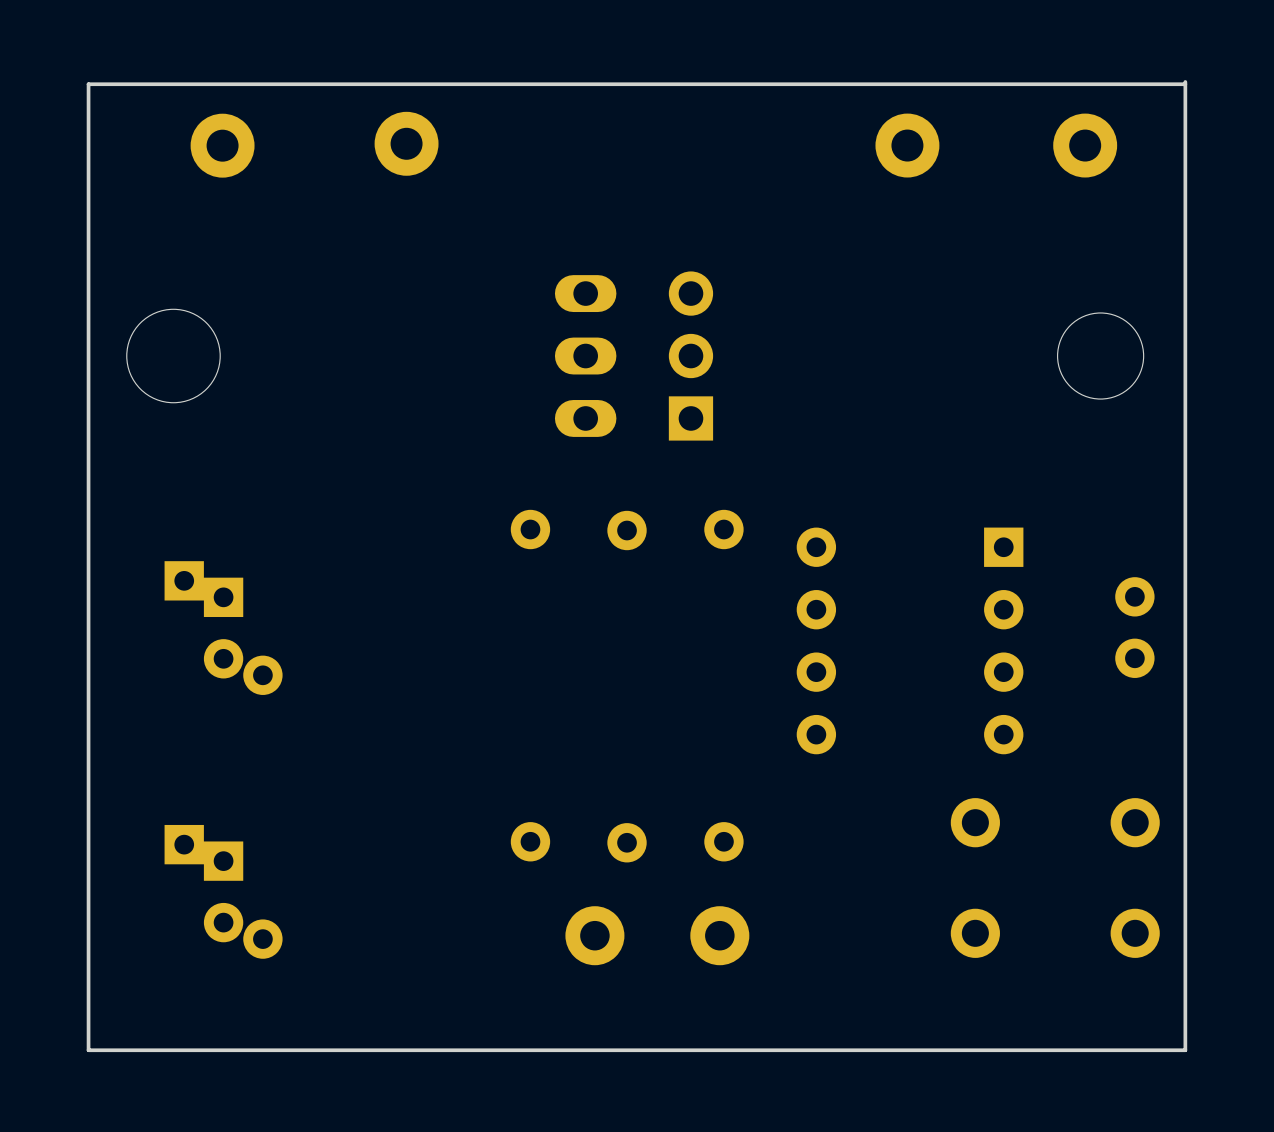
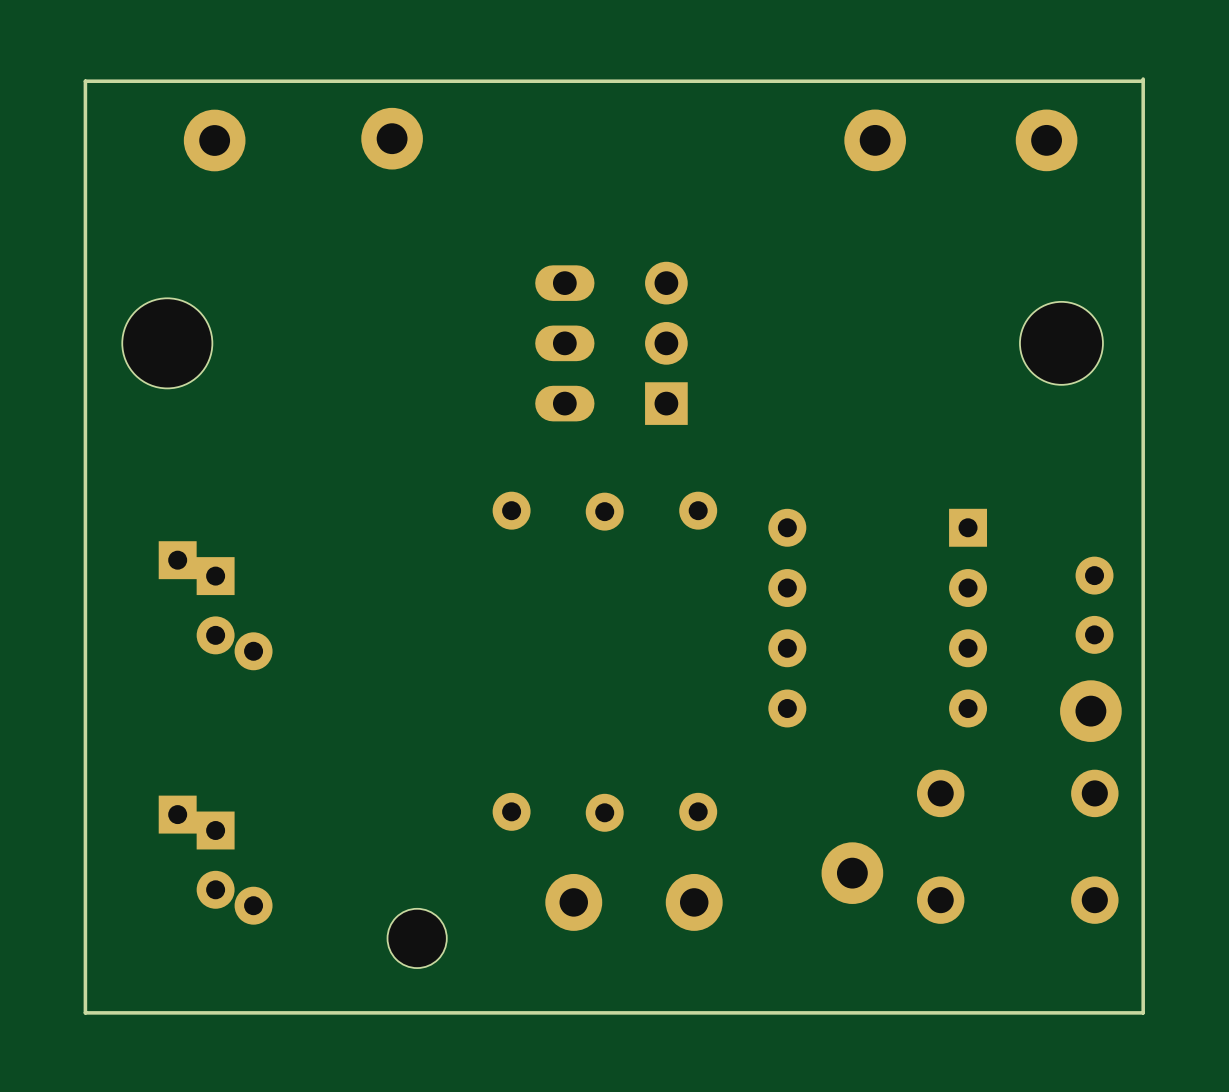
part: none -> (1090, 711)
part: none -> (852, 873)
part: none -> (417, 938)

